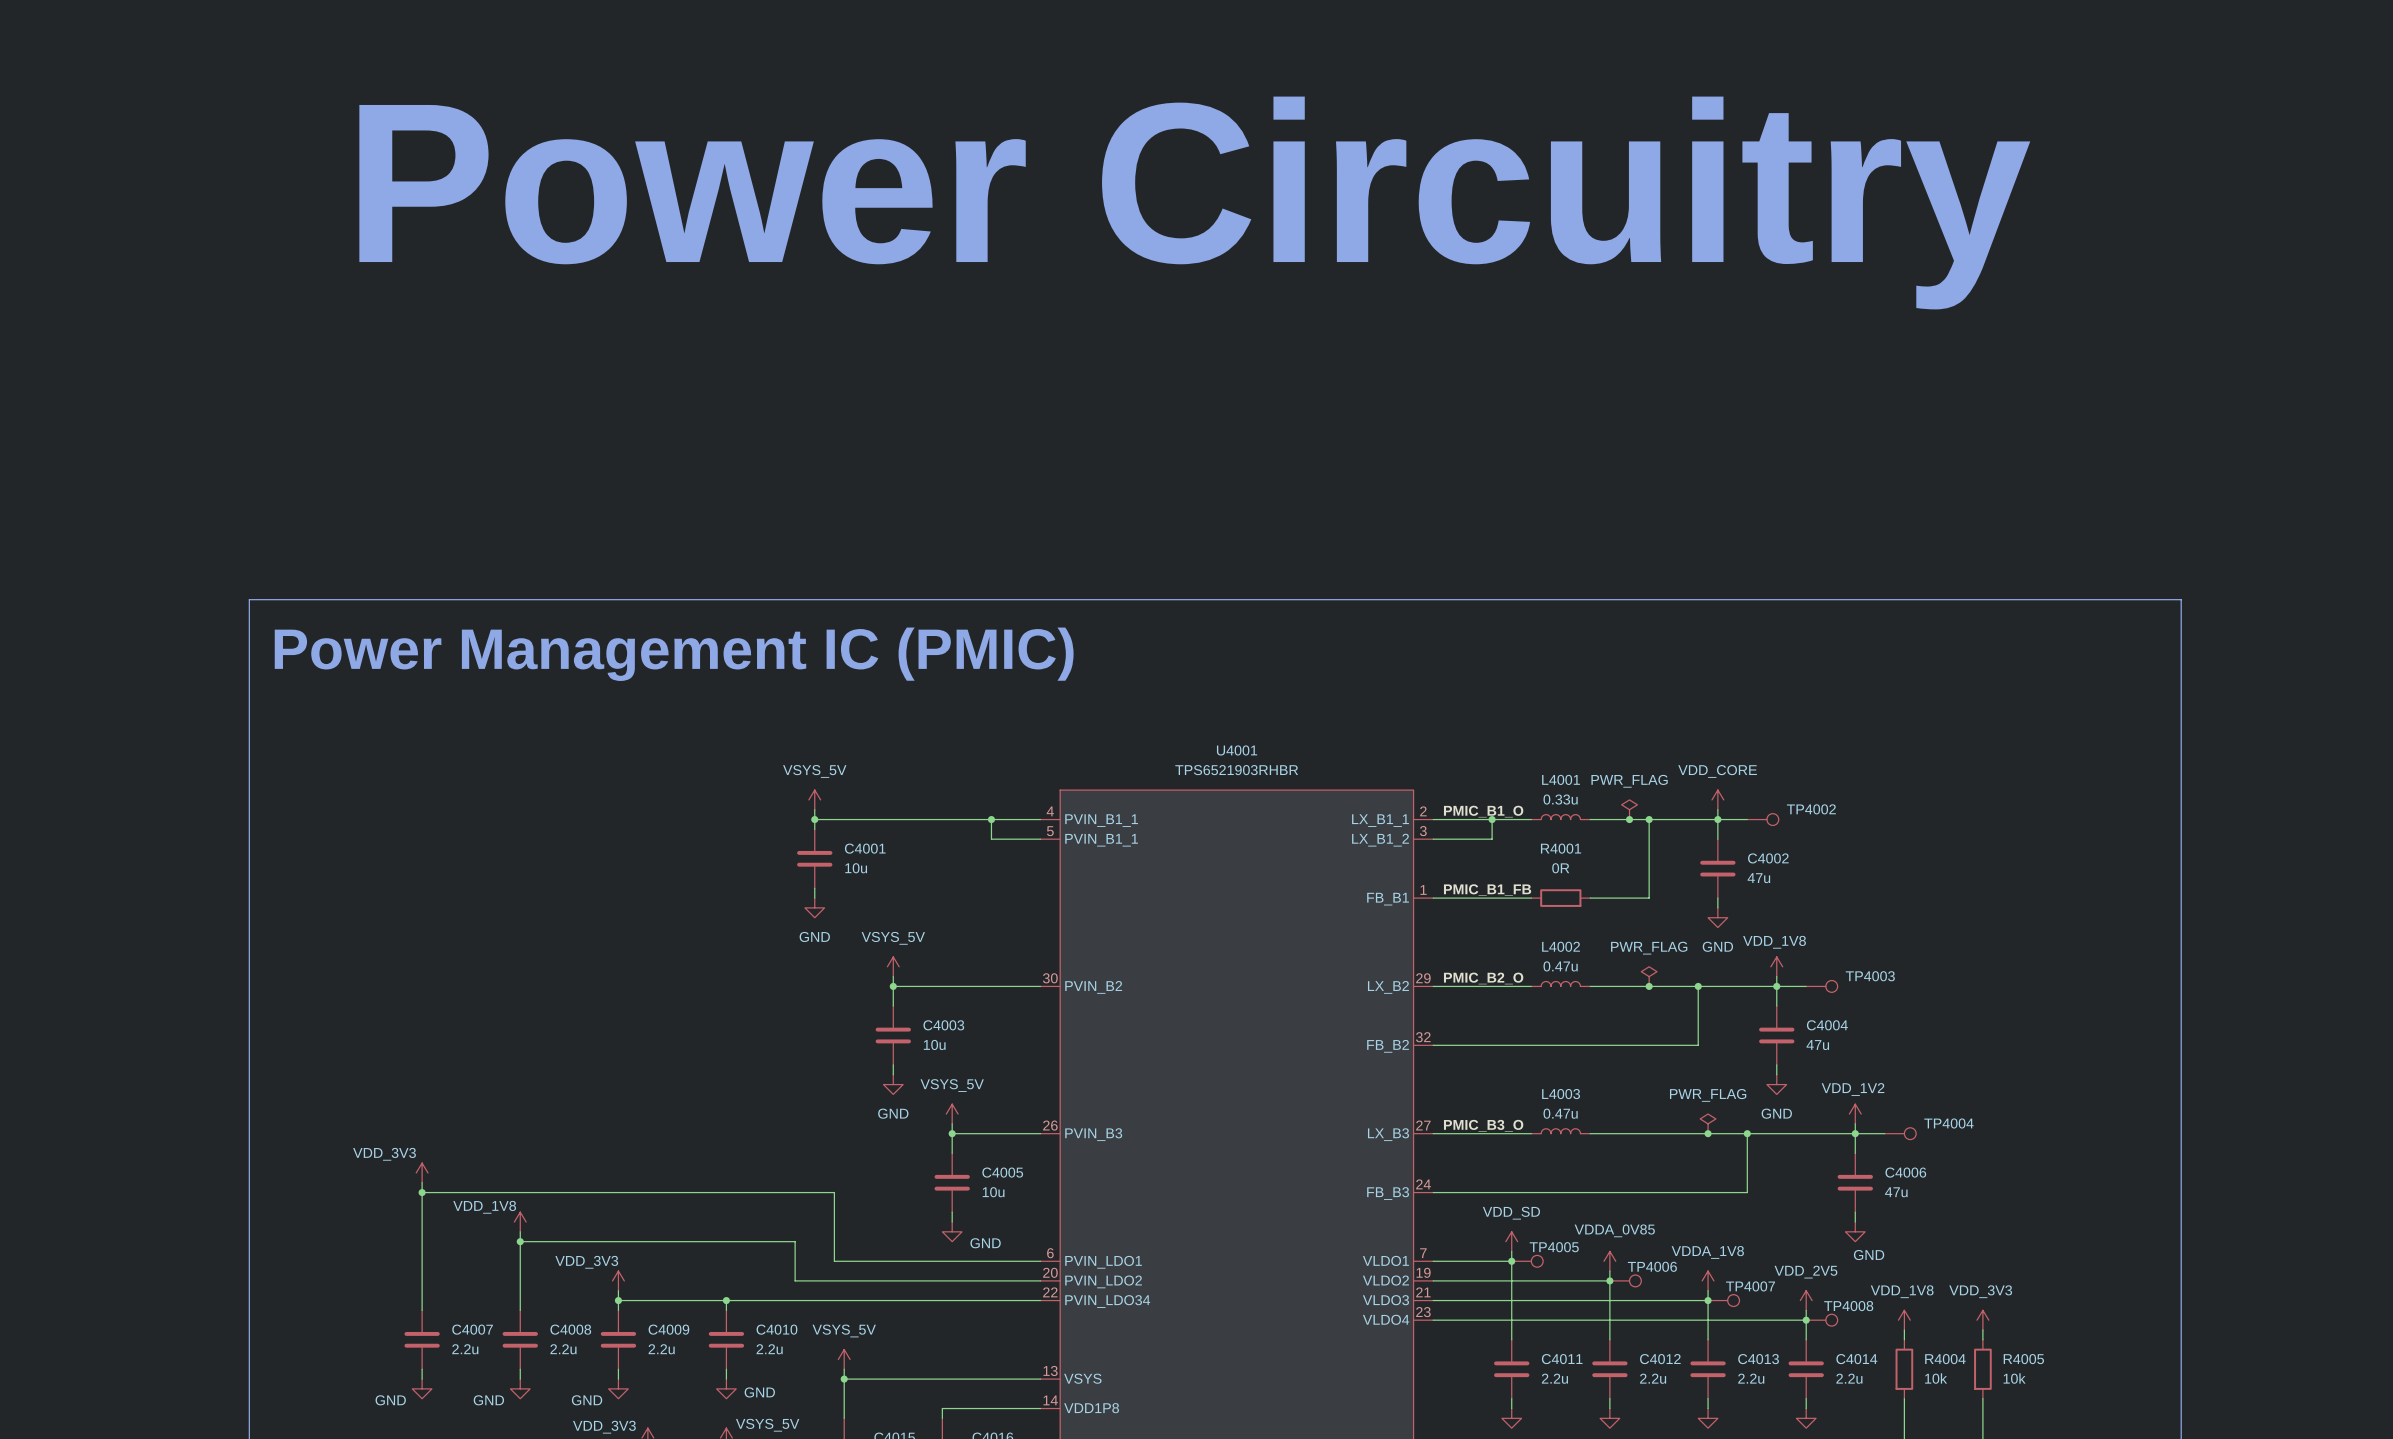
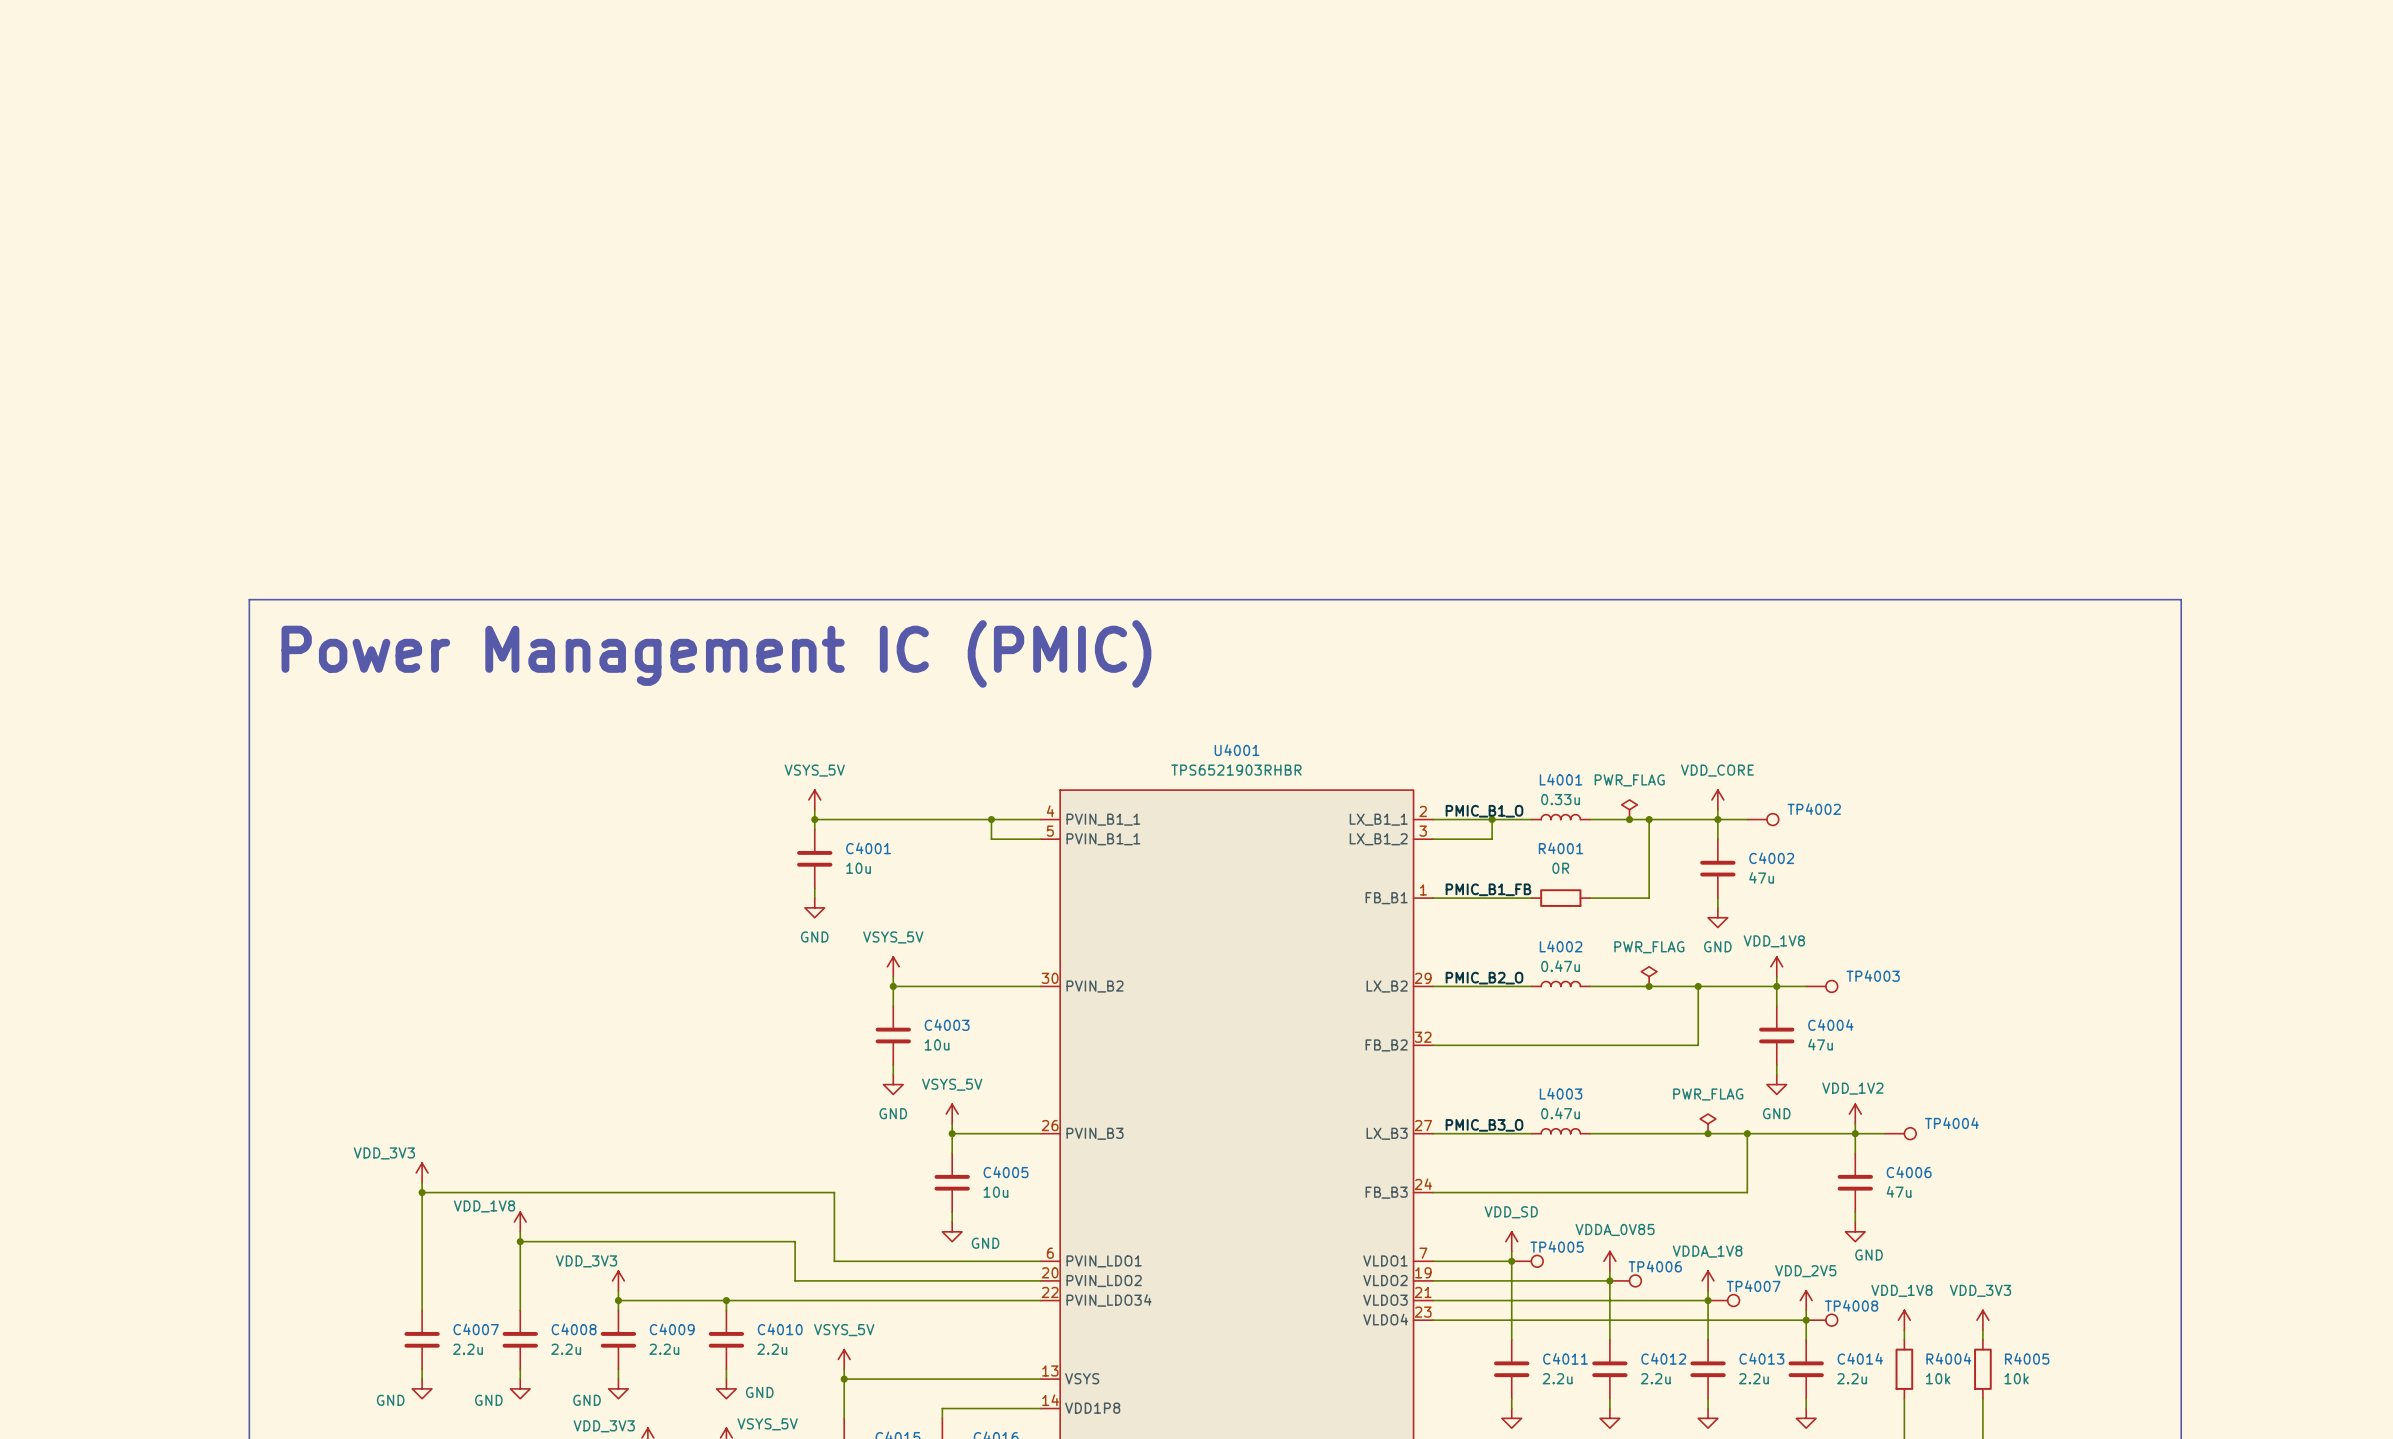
text: Power Circuitry (1194, 202) -> none

